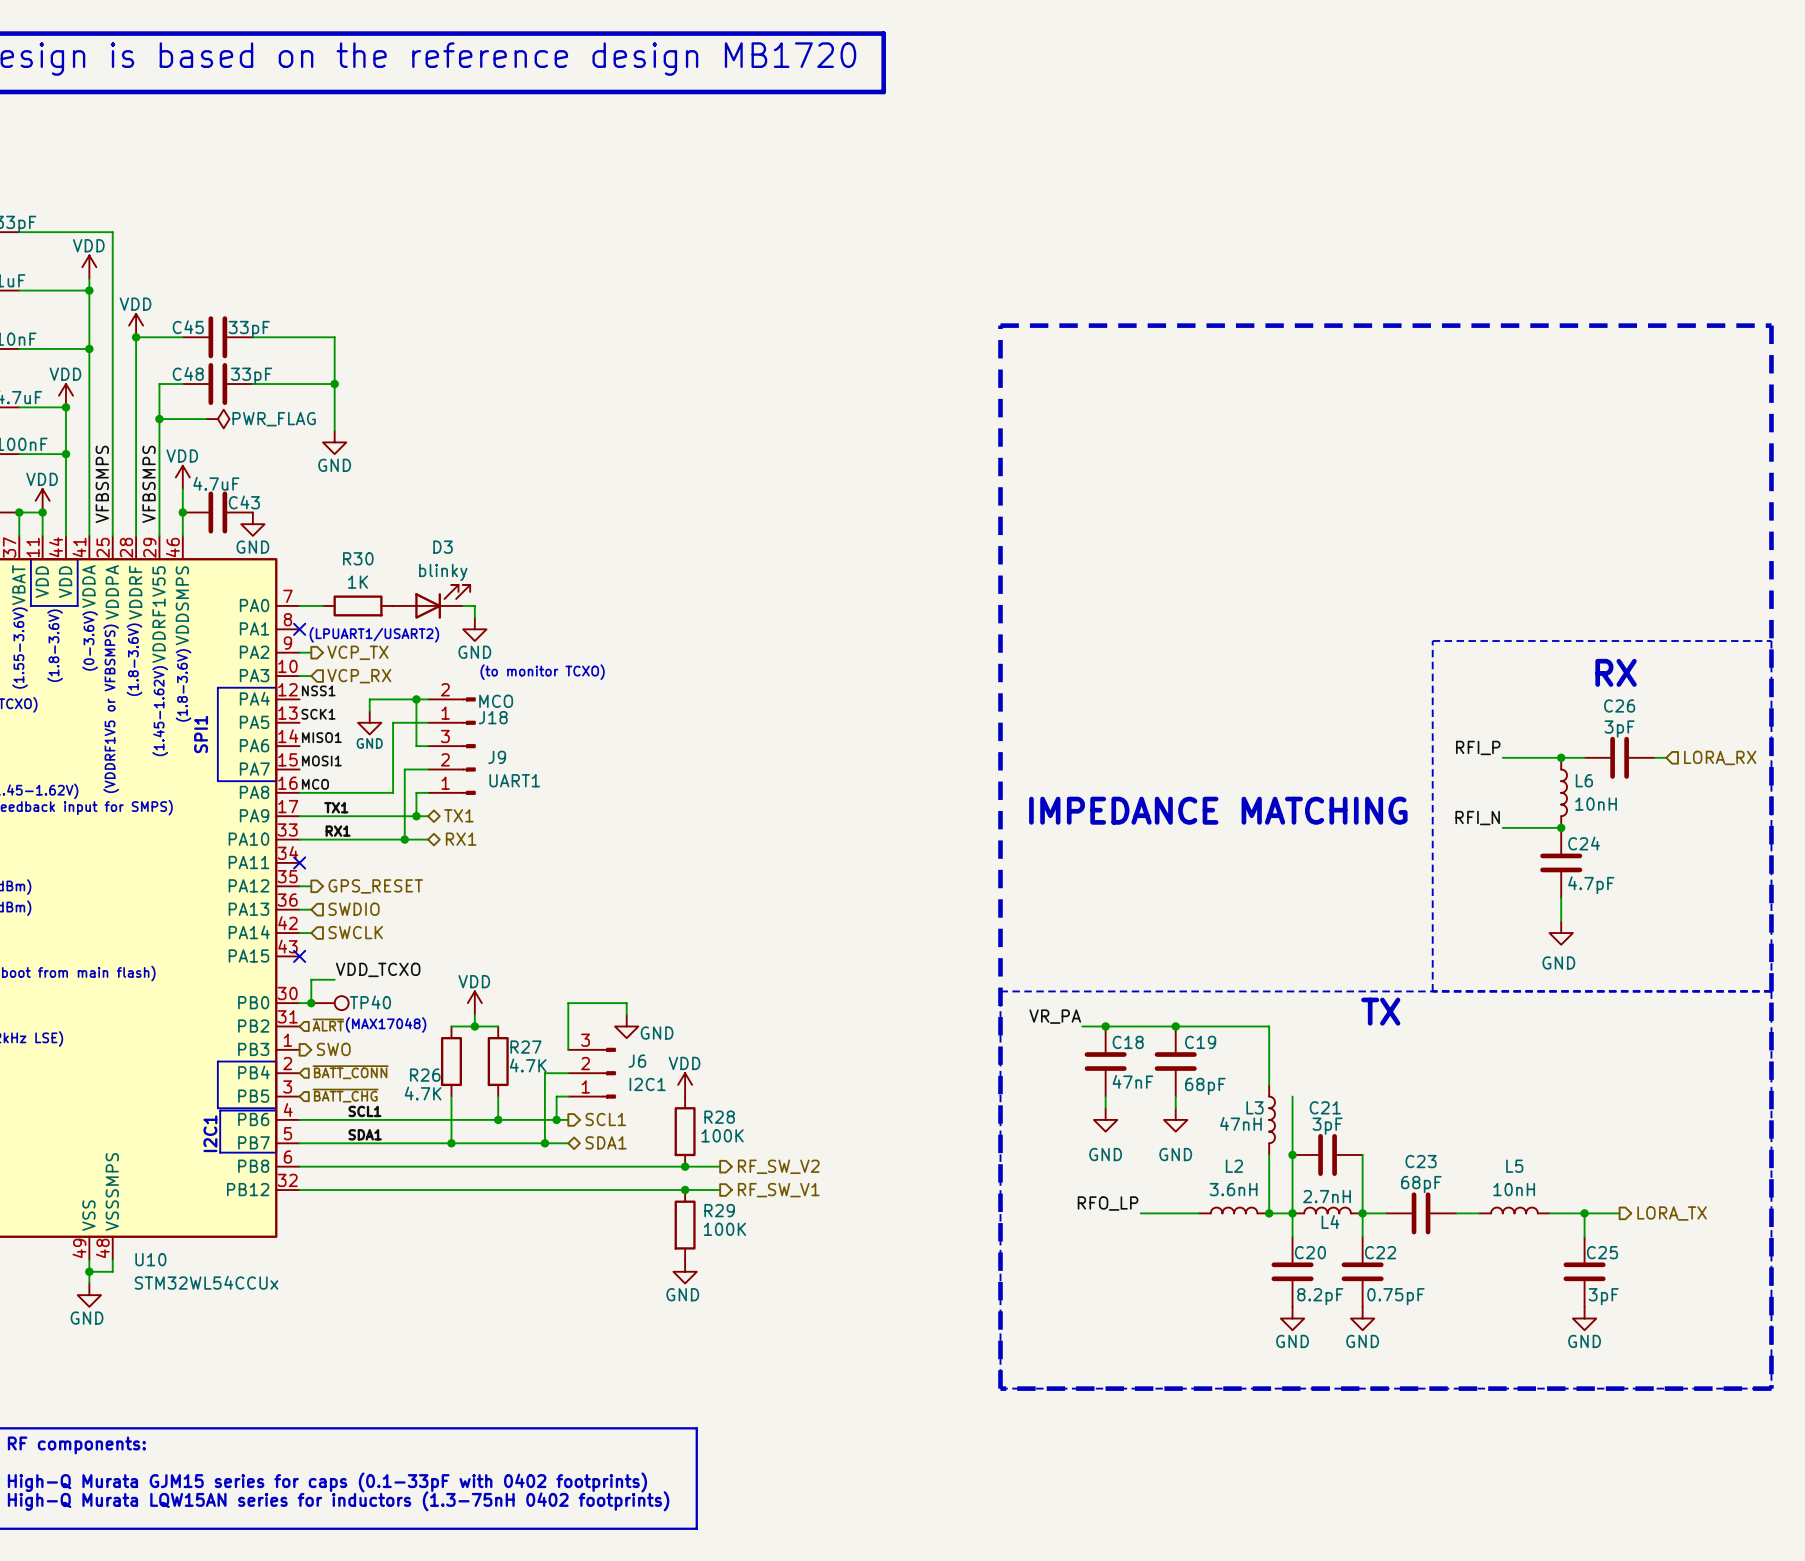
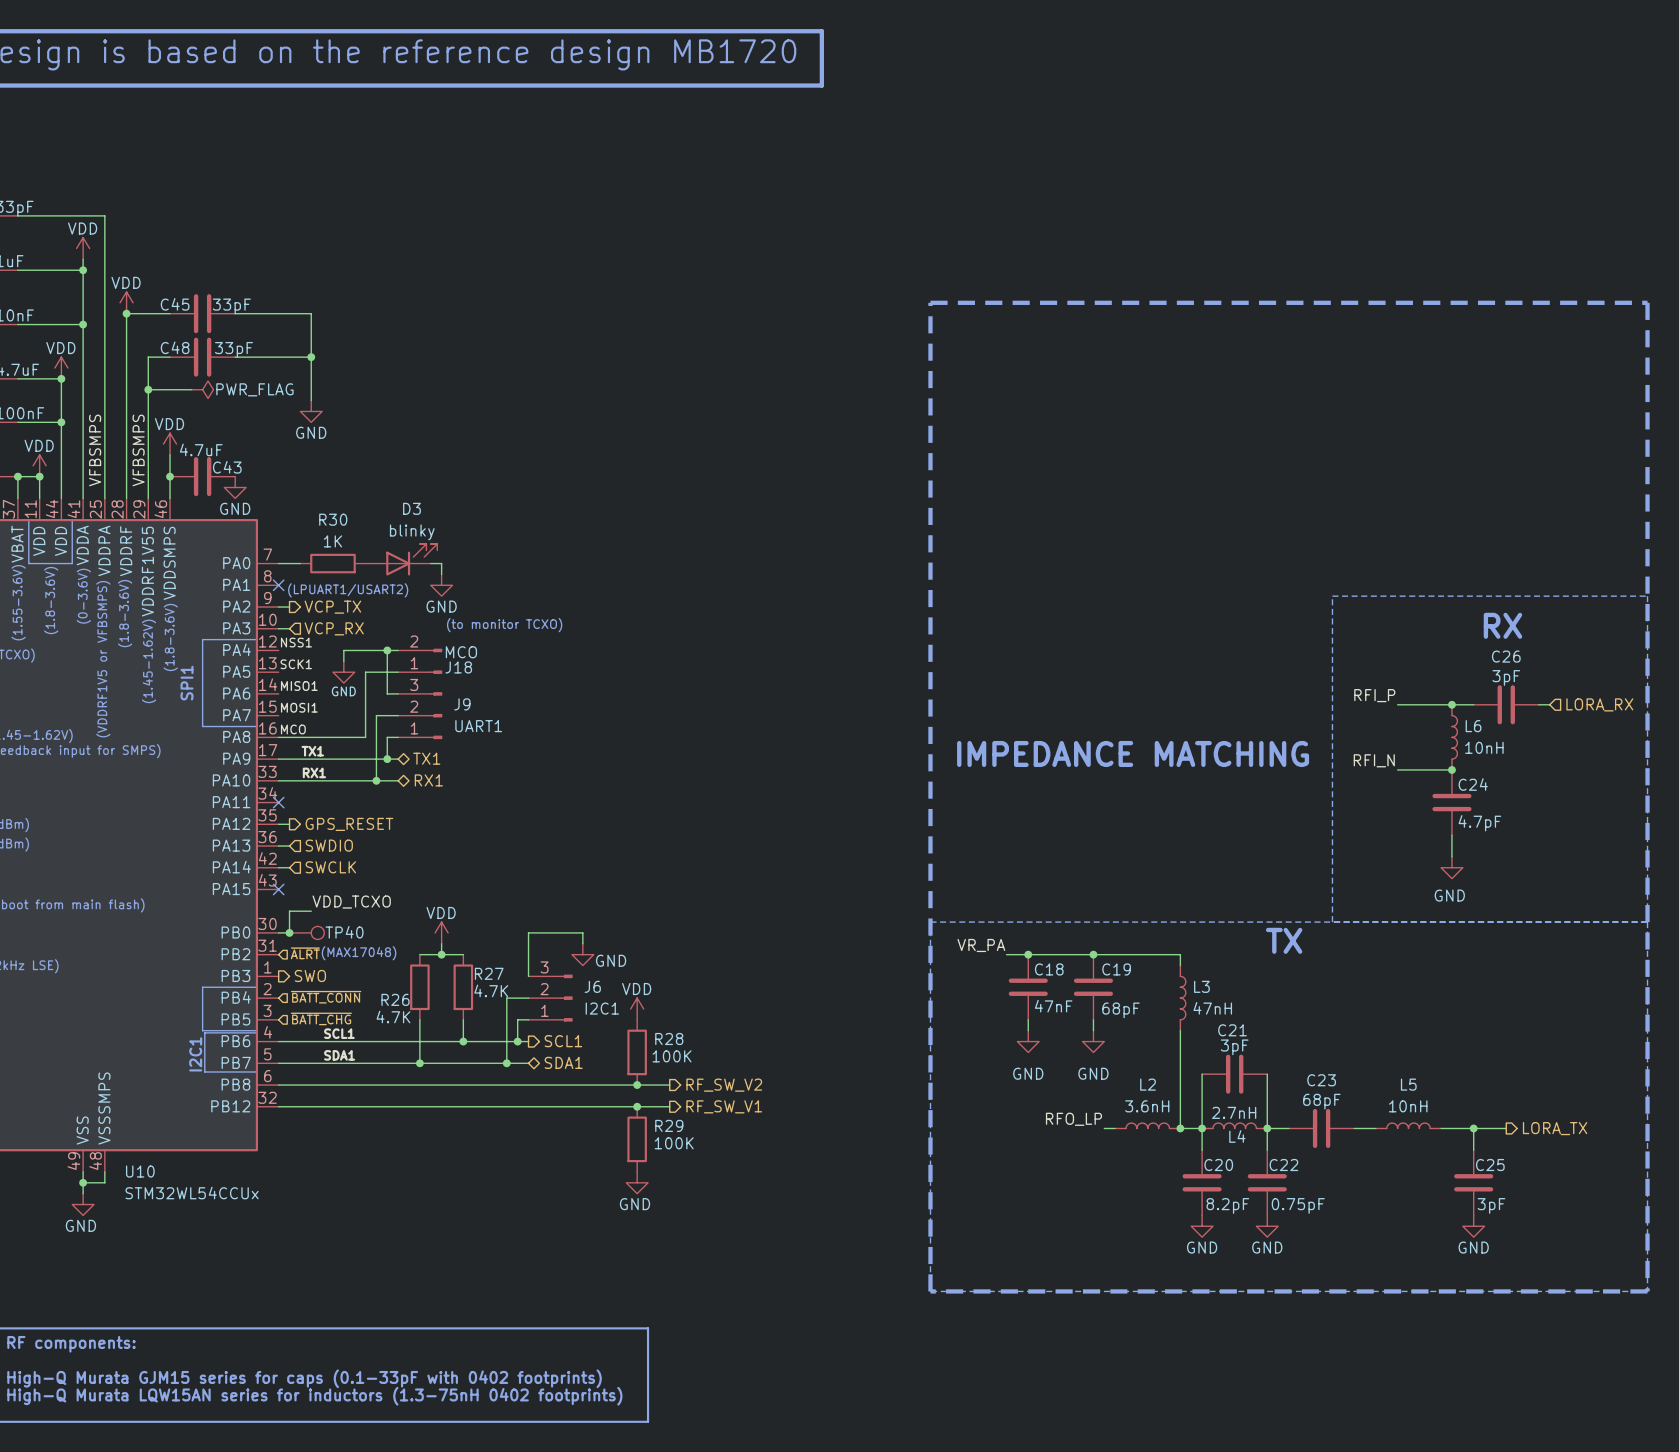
wire: (1269, 1038) (1269, 1084) -> (1180, 1030) (1180, 1074)
wire: (1292, 1096) (1292, 1154) -> none
L3 name position: L3 (1254, 1107) -> L3 (1201, 986)
L3 position: (1272, 1119) -> (1183, 998)
L3 value position: 47nH (1240, 1123) -> 47nH (1212, 1008)
junction: (1292, 1154) -> none
label position: RFO_LP (1108, 1203) -> RFO_LP (1073, 1119)
wire: (1140, 1213) (1187, 1213) -> none

